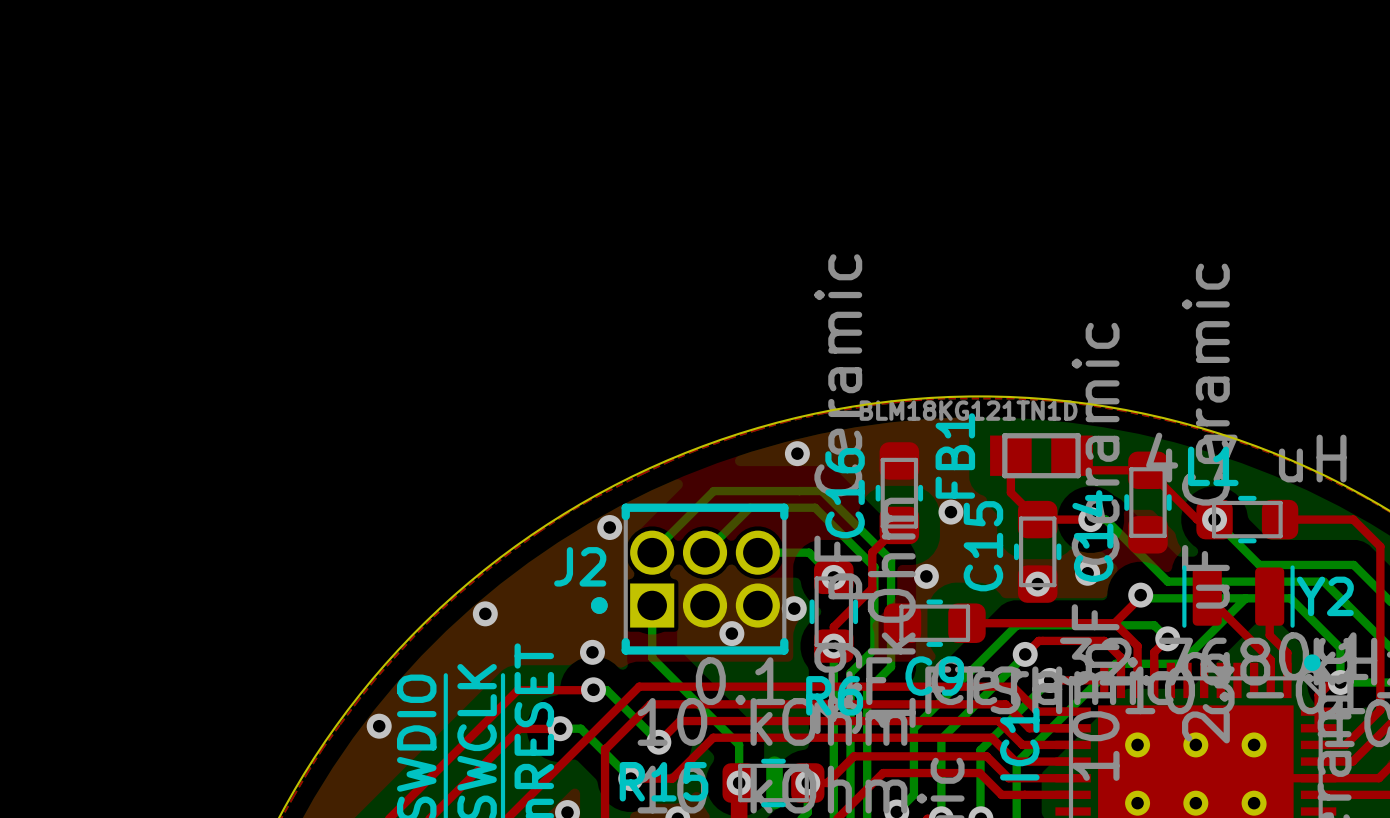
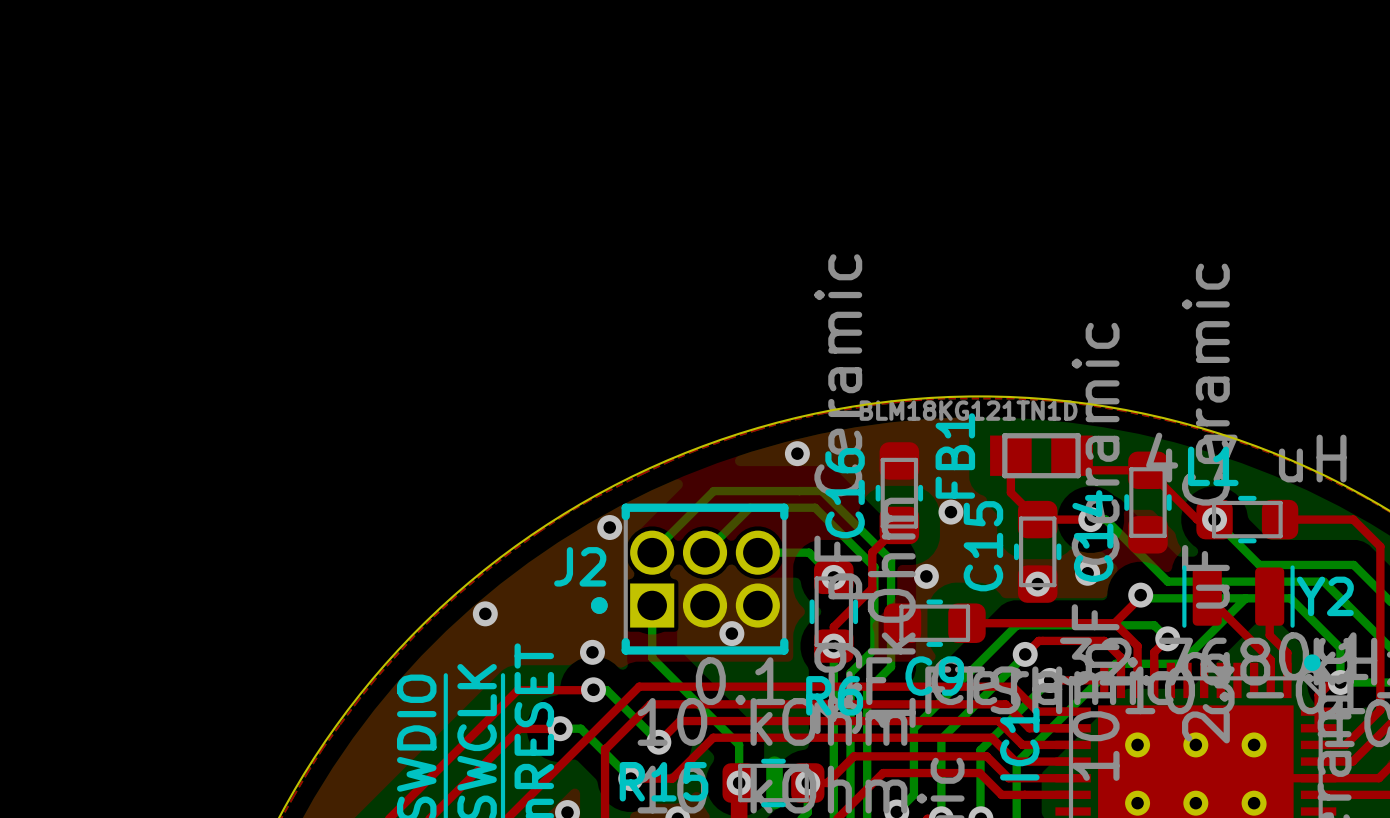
via: (794, 608) -> none
via: (379, 726) -> none

